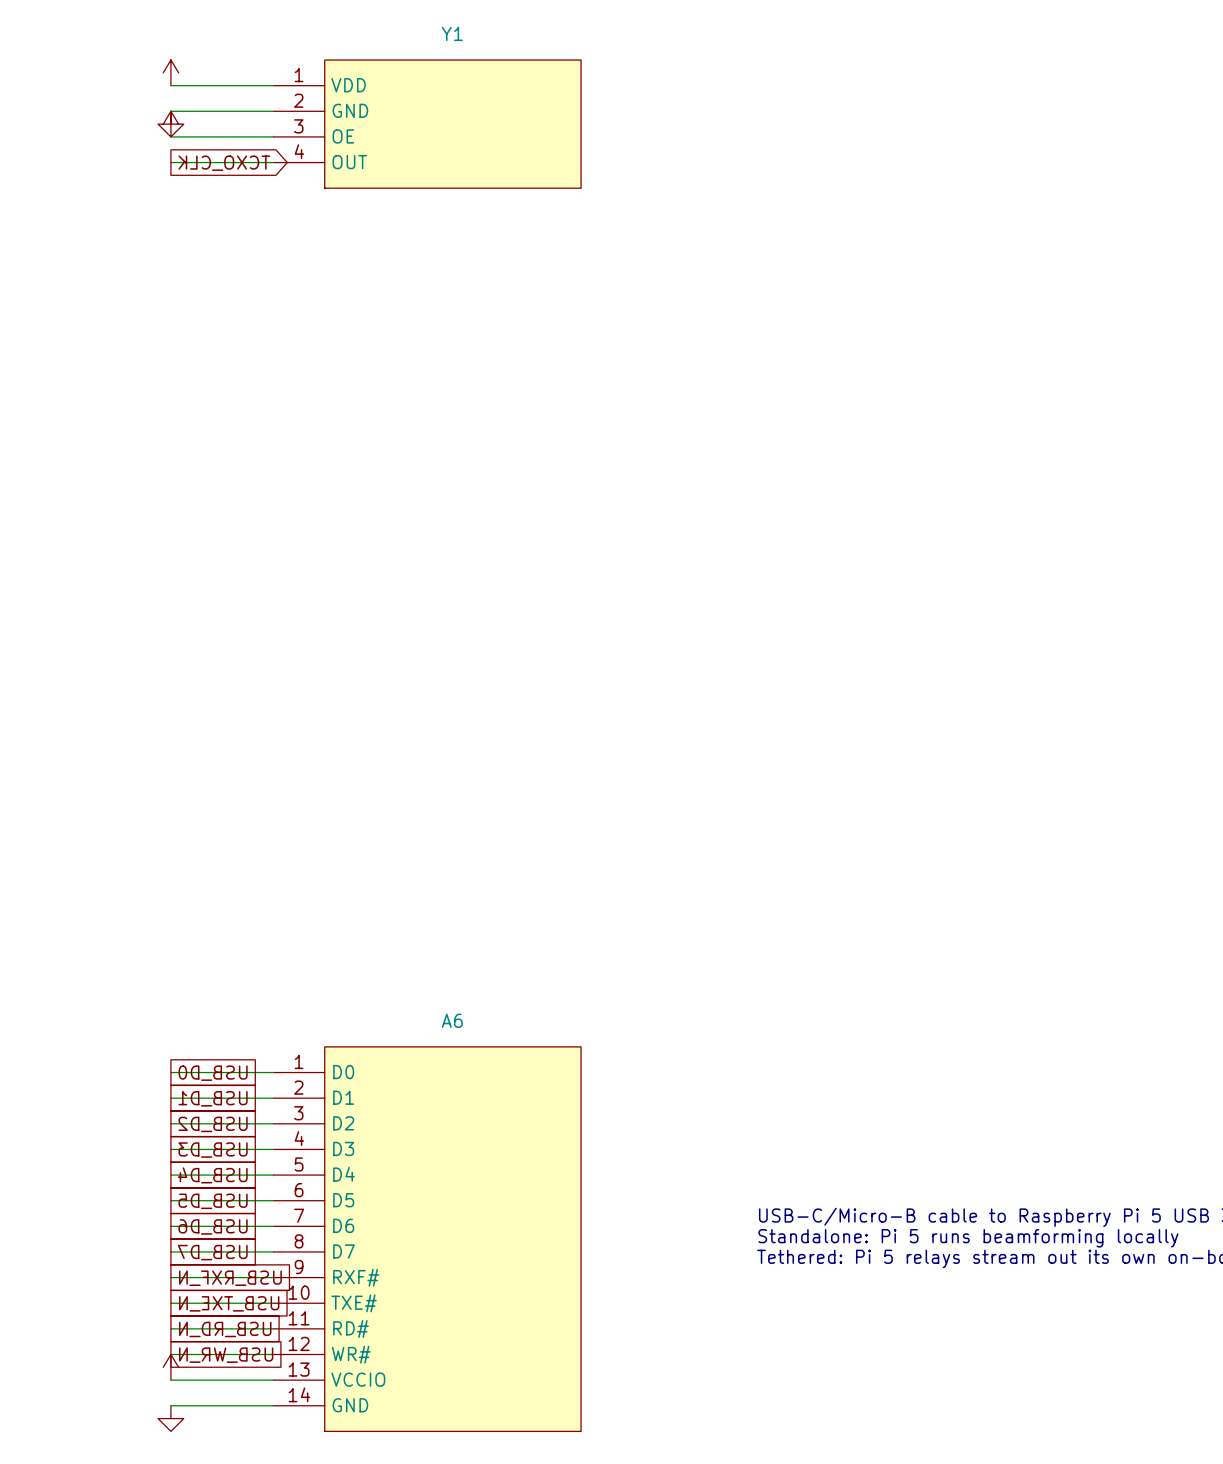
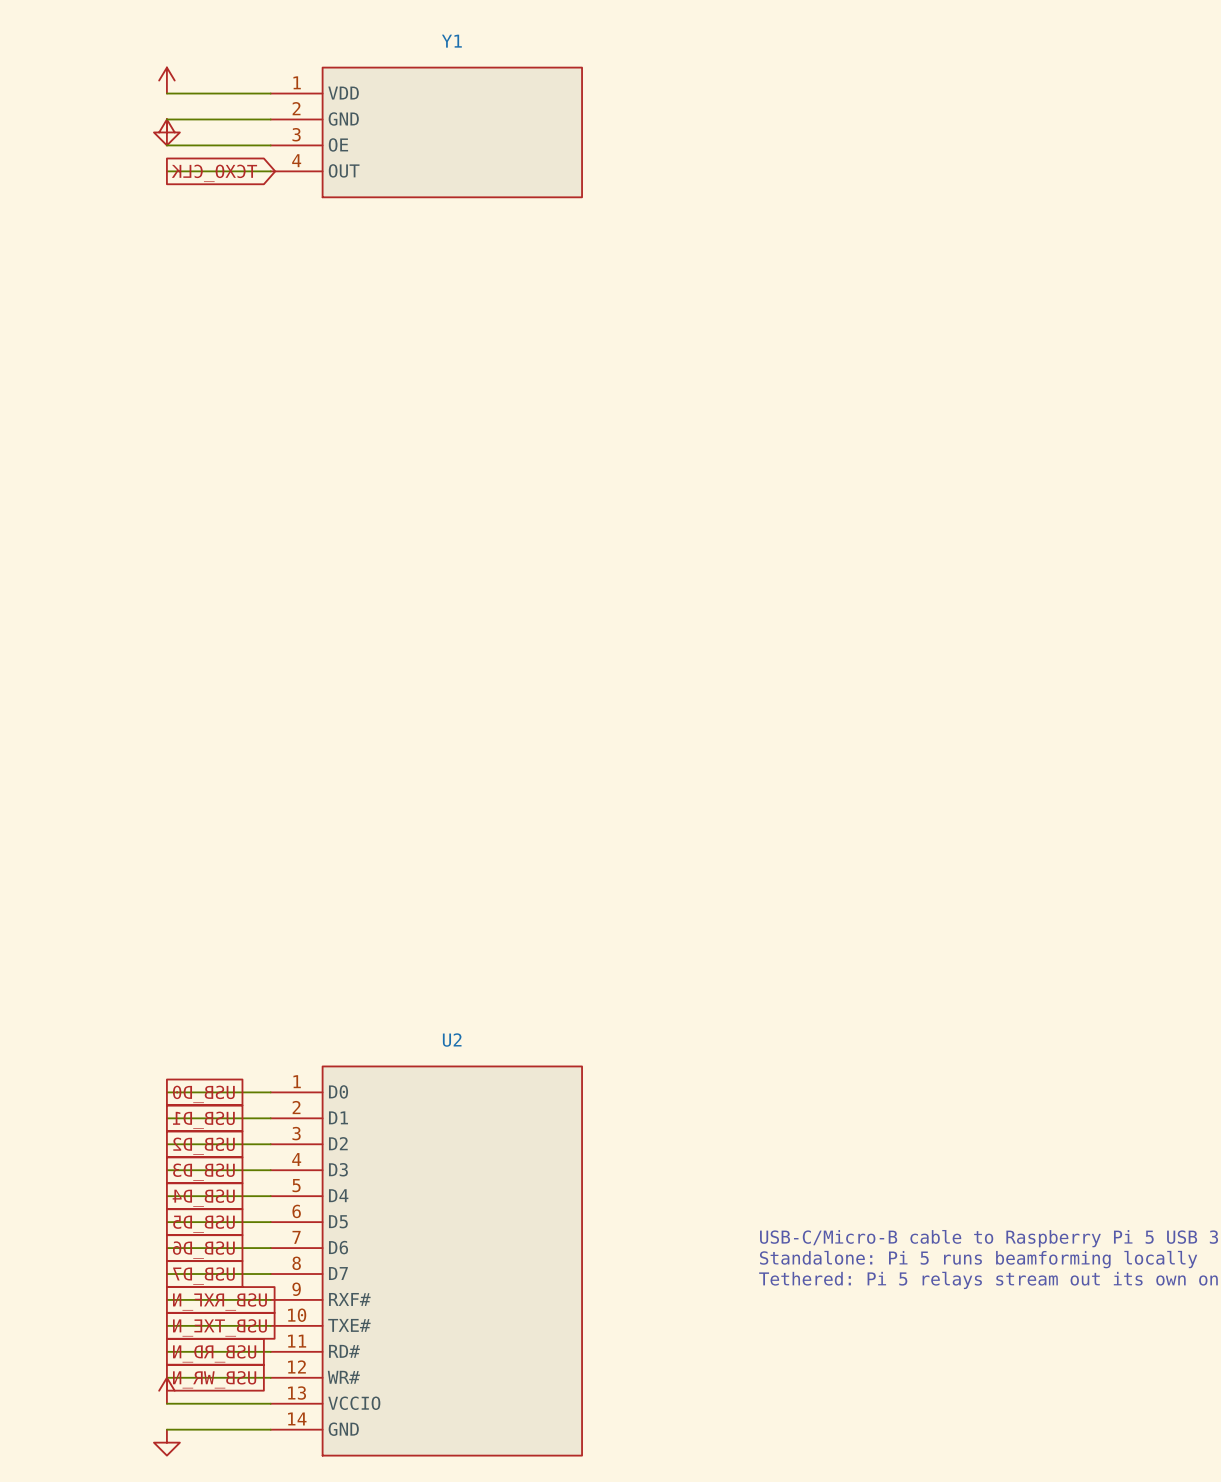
A6 name: A6 (452, 1020) -> U2 (452, 1040)

